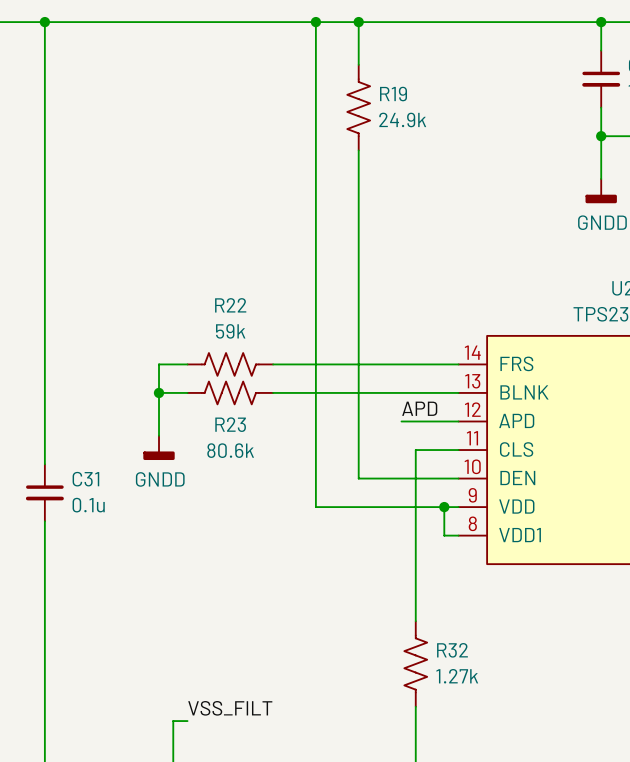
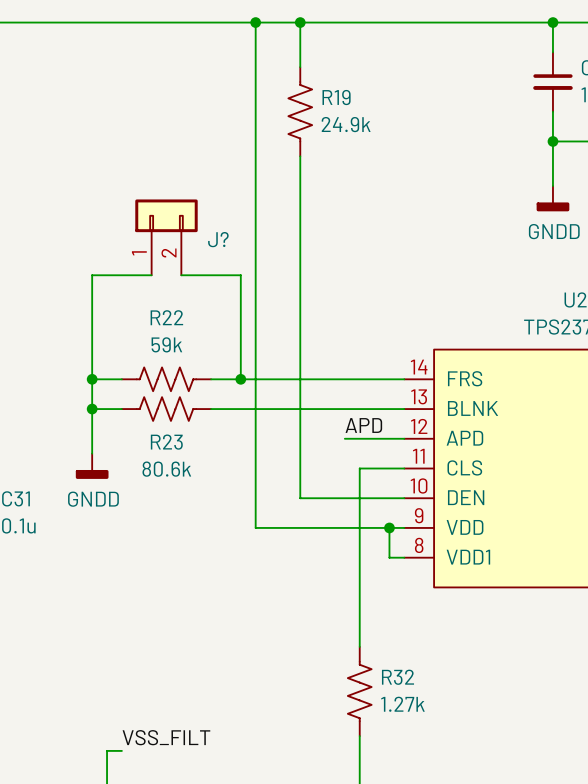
J?: none -> (166, 237)
wire: none -> (151, 275) (92, 275) (92, 379)
wire: none -> (181, 275) (240, 275) (240, 379)
junction: none -> (92, 379)
junction: none -> (240, 379)

